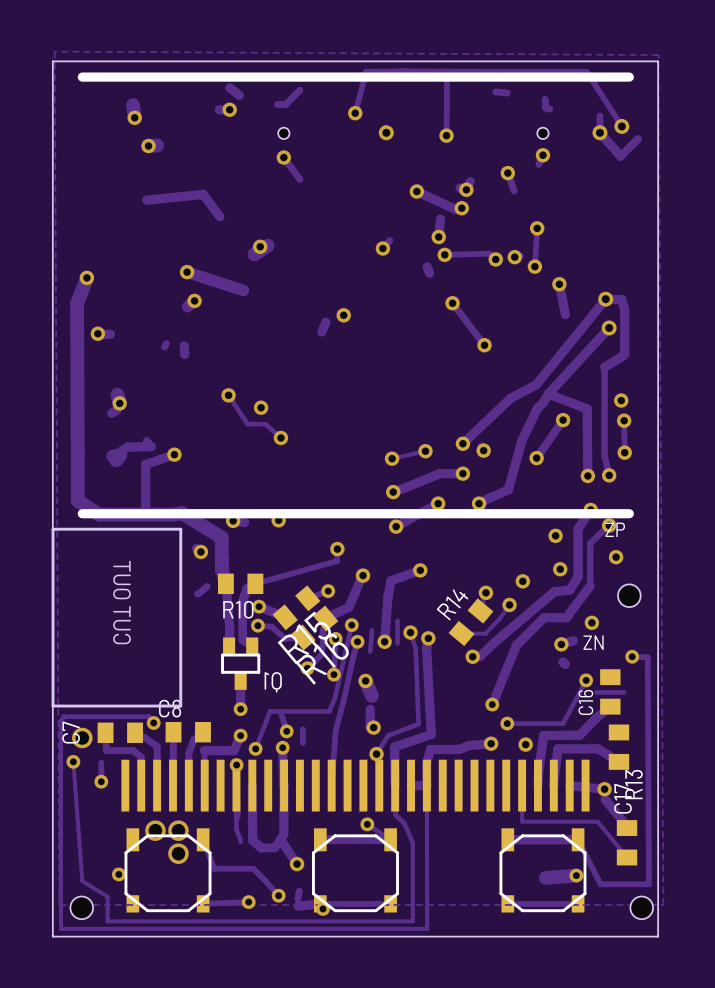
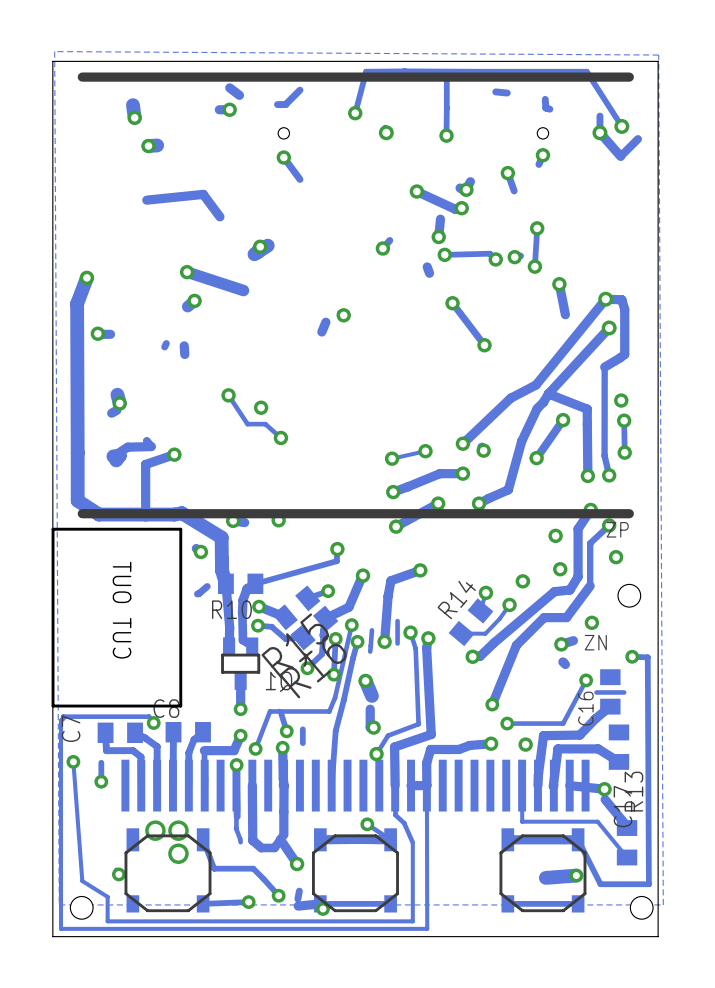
via: (82, 737) -> none

